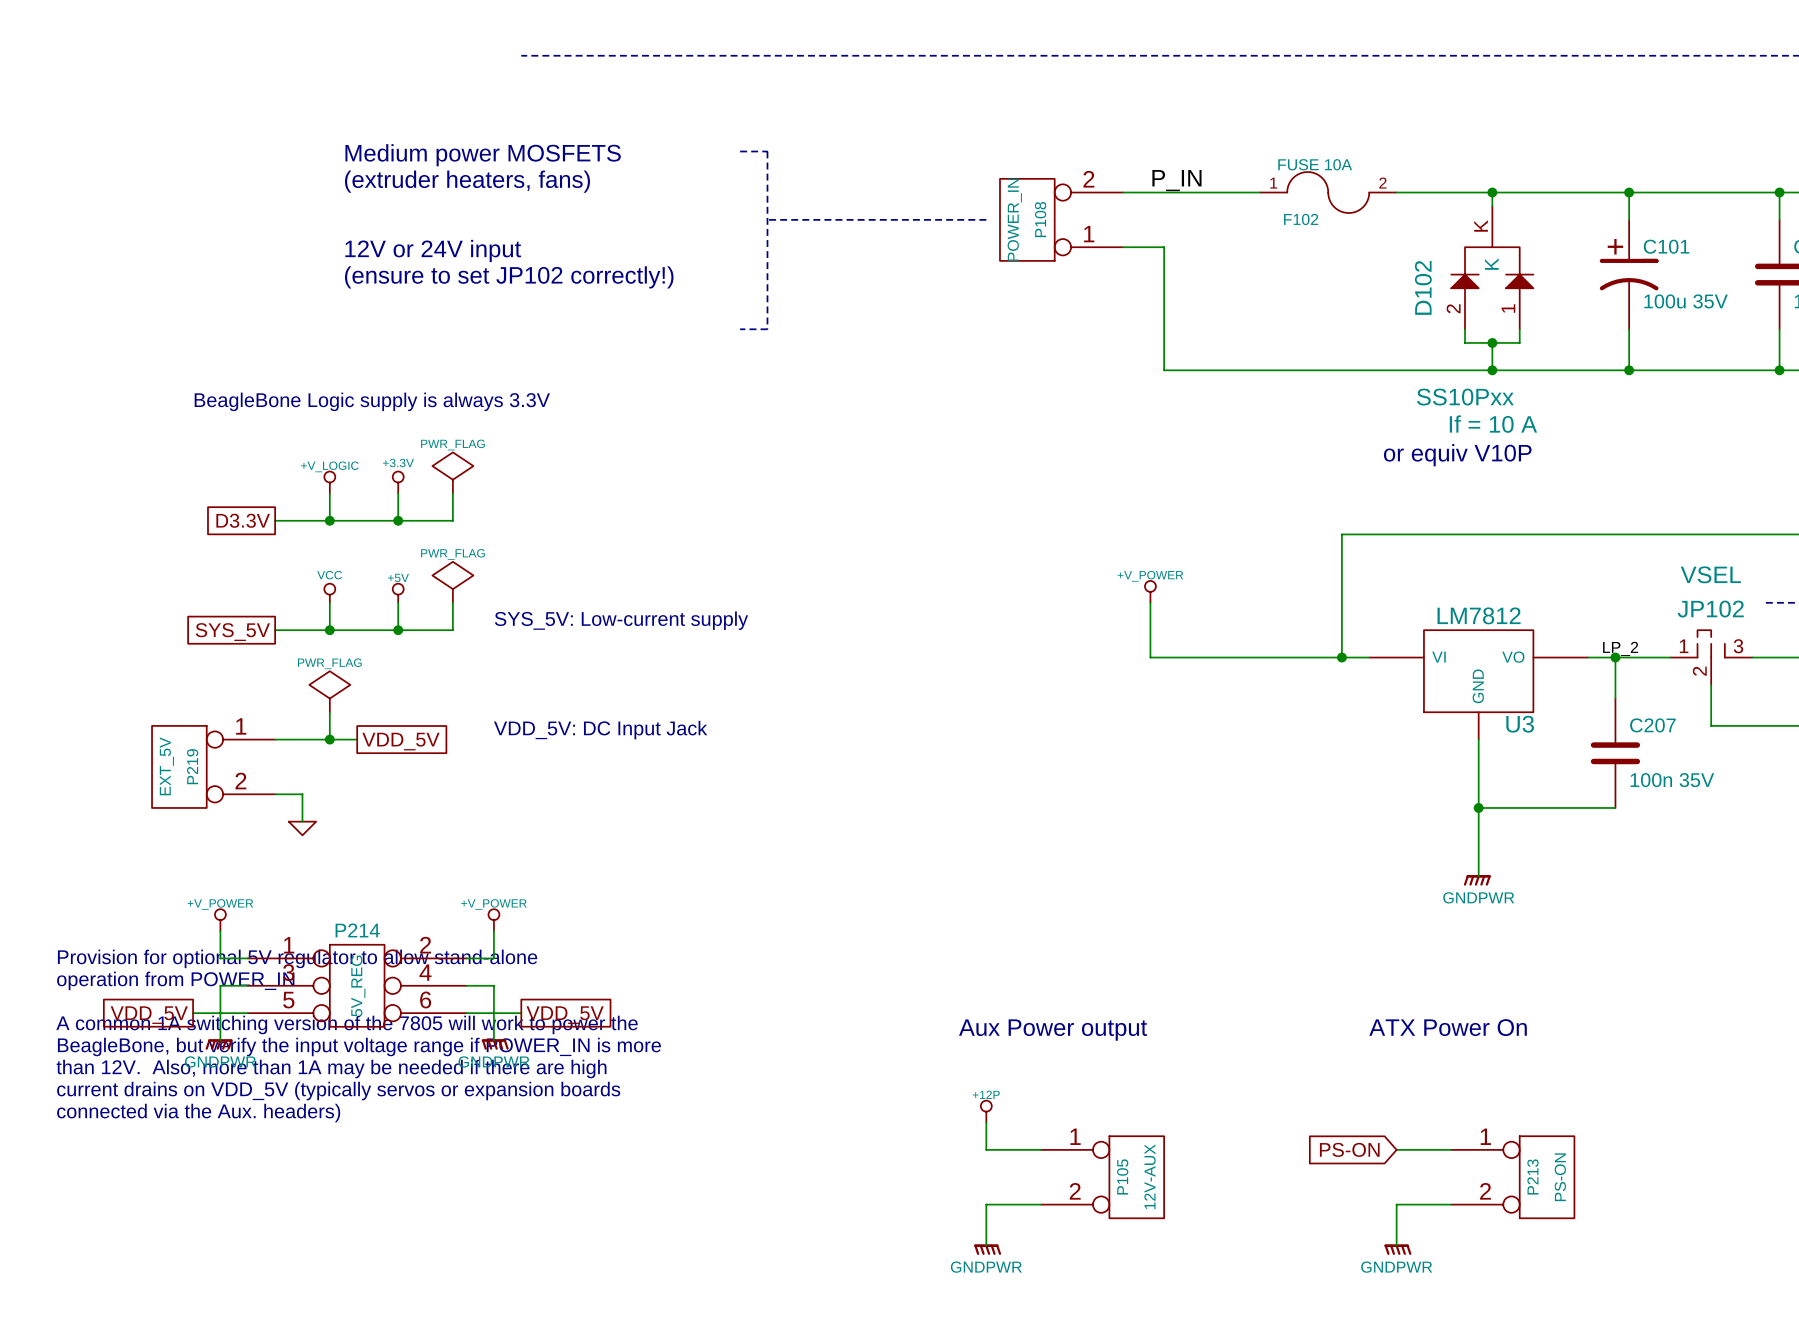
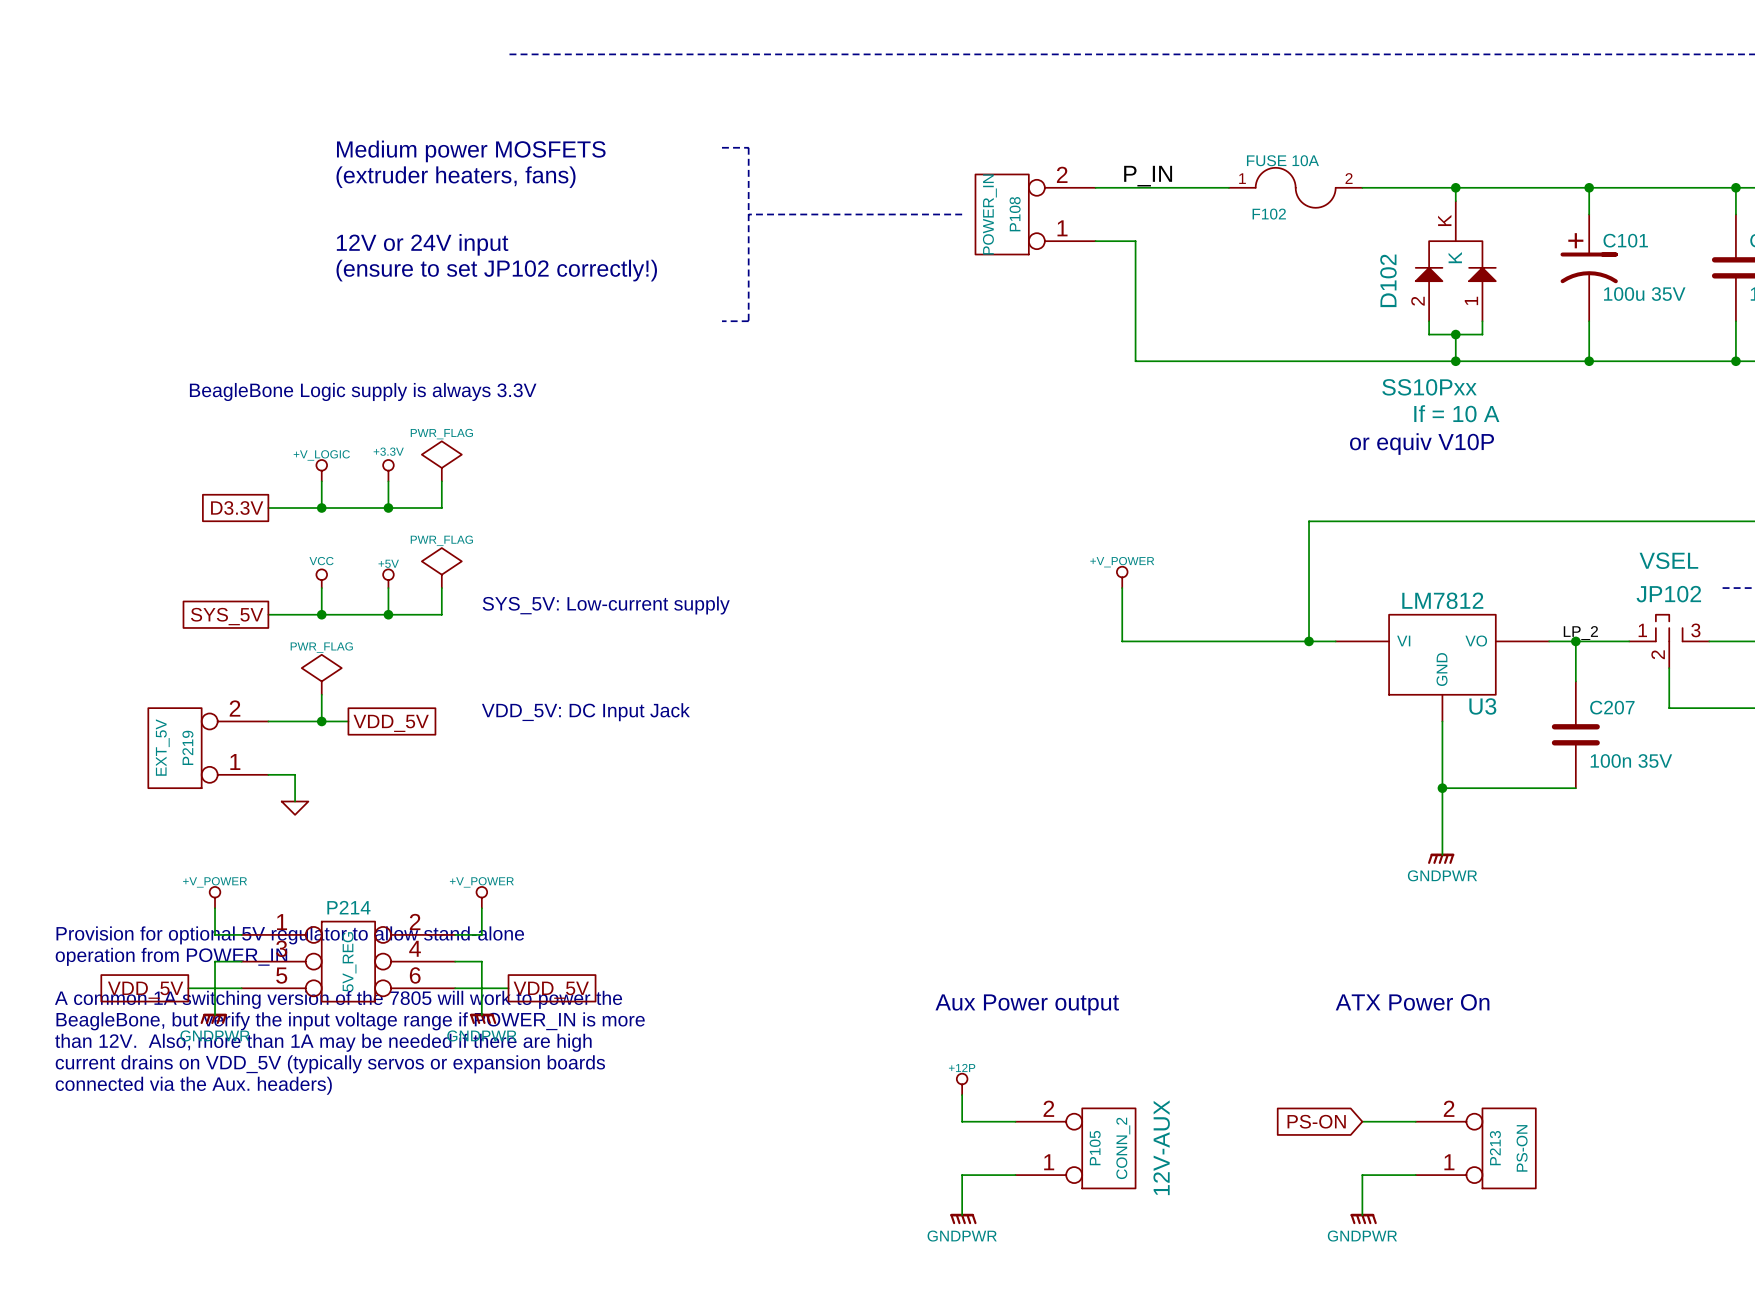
P219 flip: as is (179, 766) -> up-down (174, 748)
P105 value: 12V-AUX (1150, 1176) -> CONN_2 (1123, 1148)
P105 text: none -> 12V-AUX (1161, 1147)
P105 flip: as is (1136, 1177) -> up-down (1108, 1148)
P213 flip: as is (1547, 1177) -> up-down (1509, 1148)

